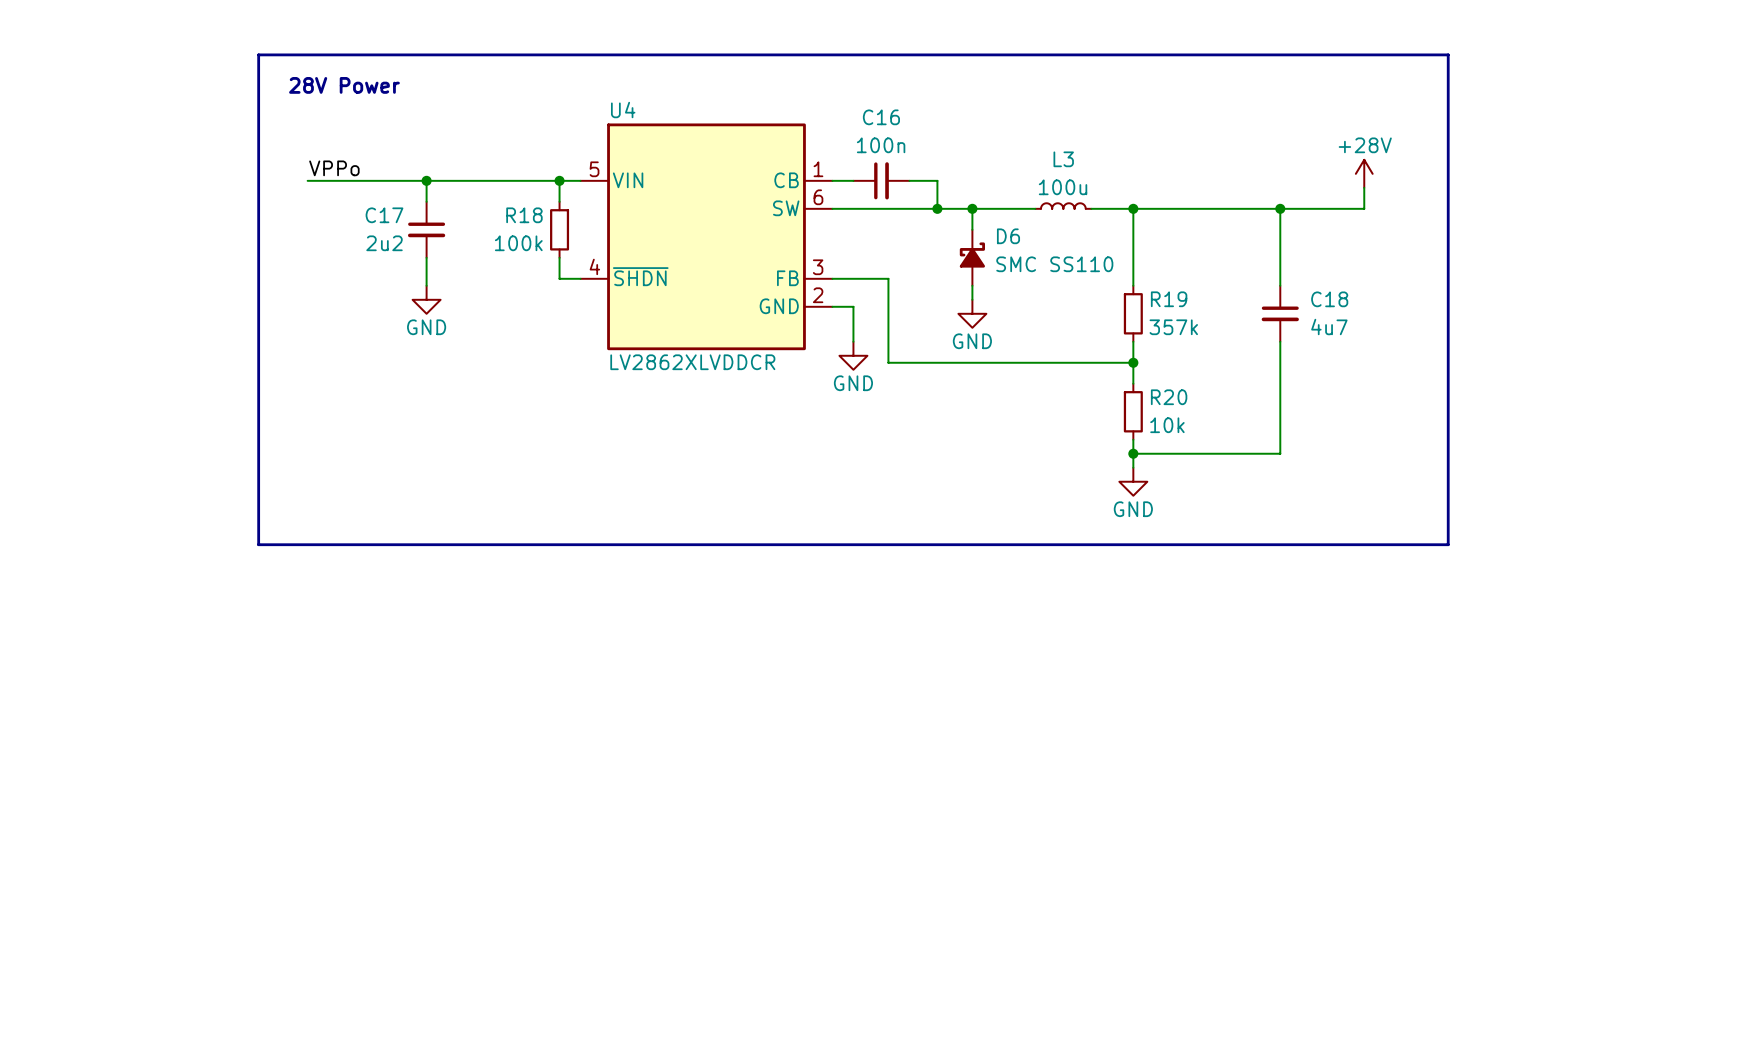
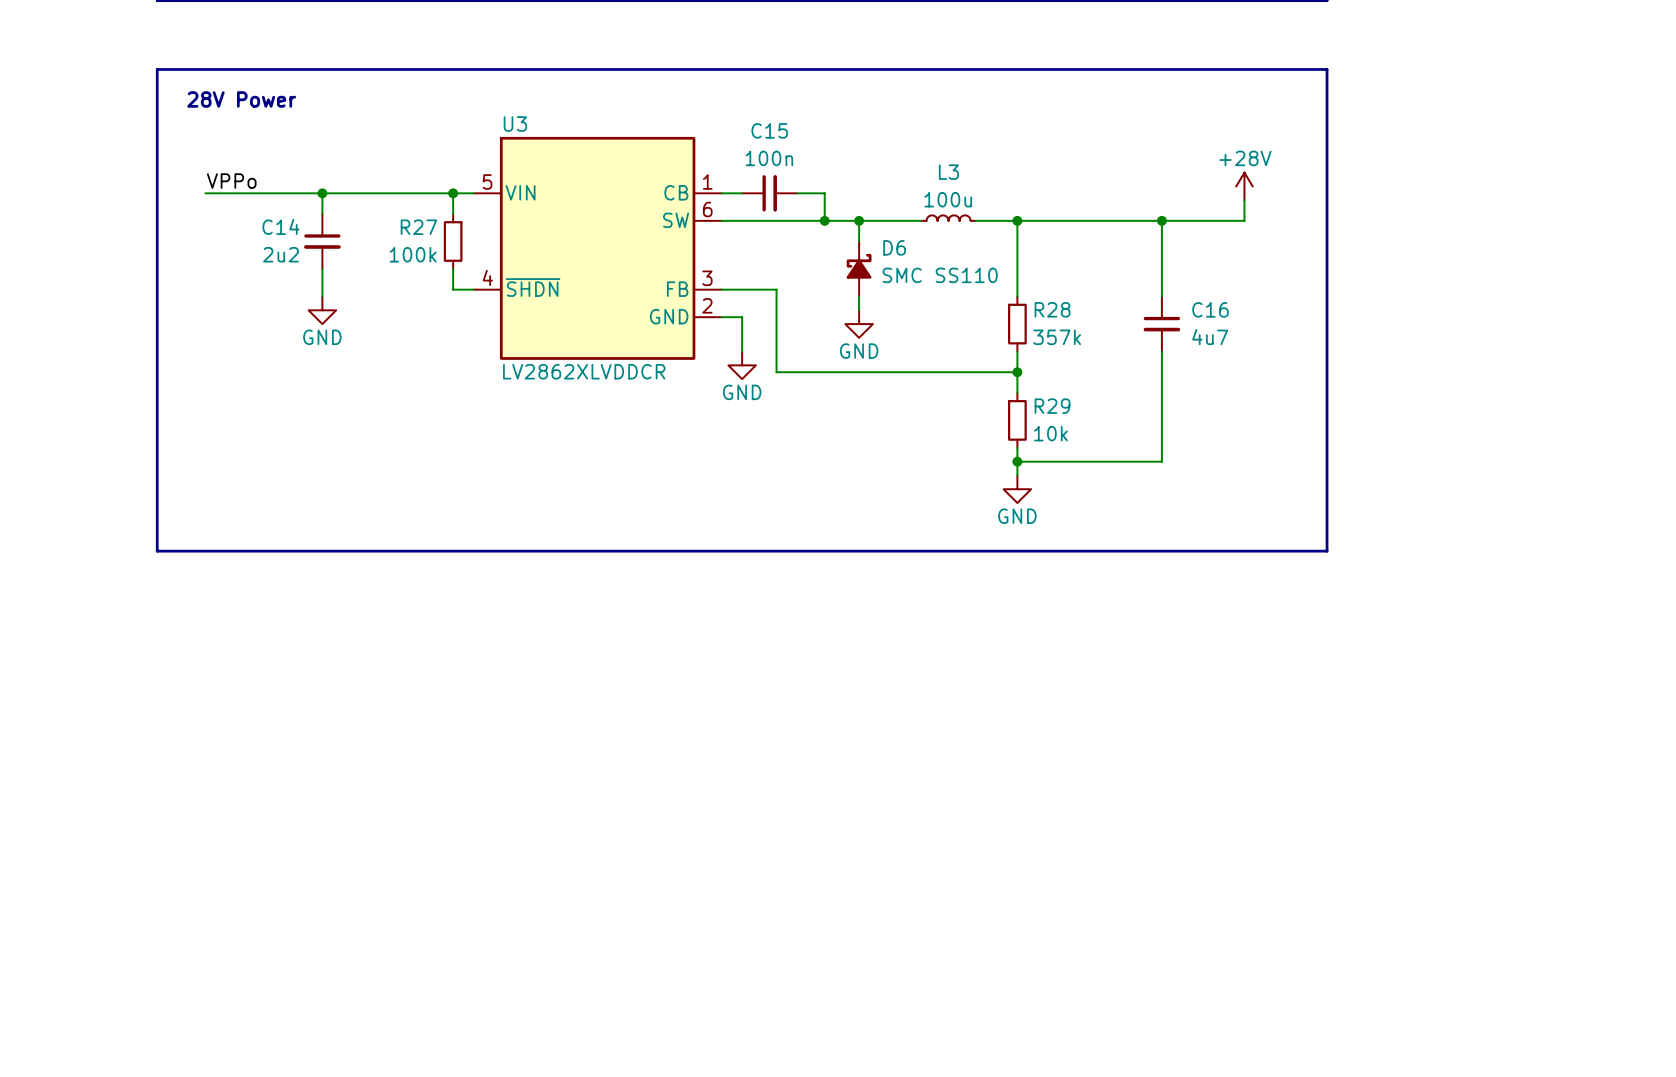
U4 name: U4 (623, 110) -> U3 (515, 124)
C16 name: C16 (881, 117) -> C15 (769, 130)
C17 name: C17 (384, 215) -> C14 (281, 226)
R18 name: R18 (524, 215) -> R27 (418, 227)
R19 name: R19 (1169, 299) -> R28 (1052, 309)
C18 name: C18 (1329, 299) -> C16 (1210, 309)
R20 name: R20 (1169, 397) -> R29 (1052, 406)

